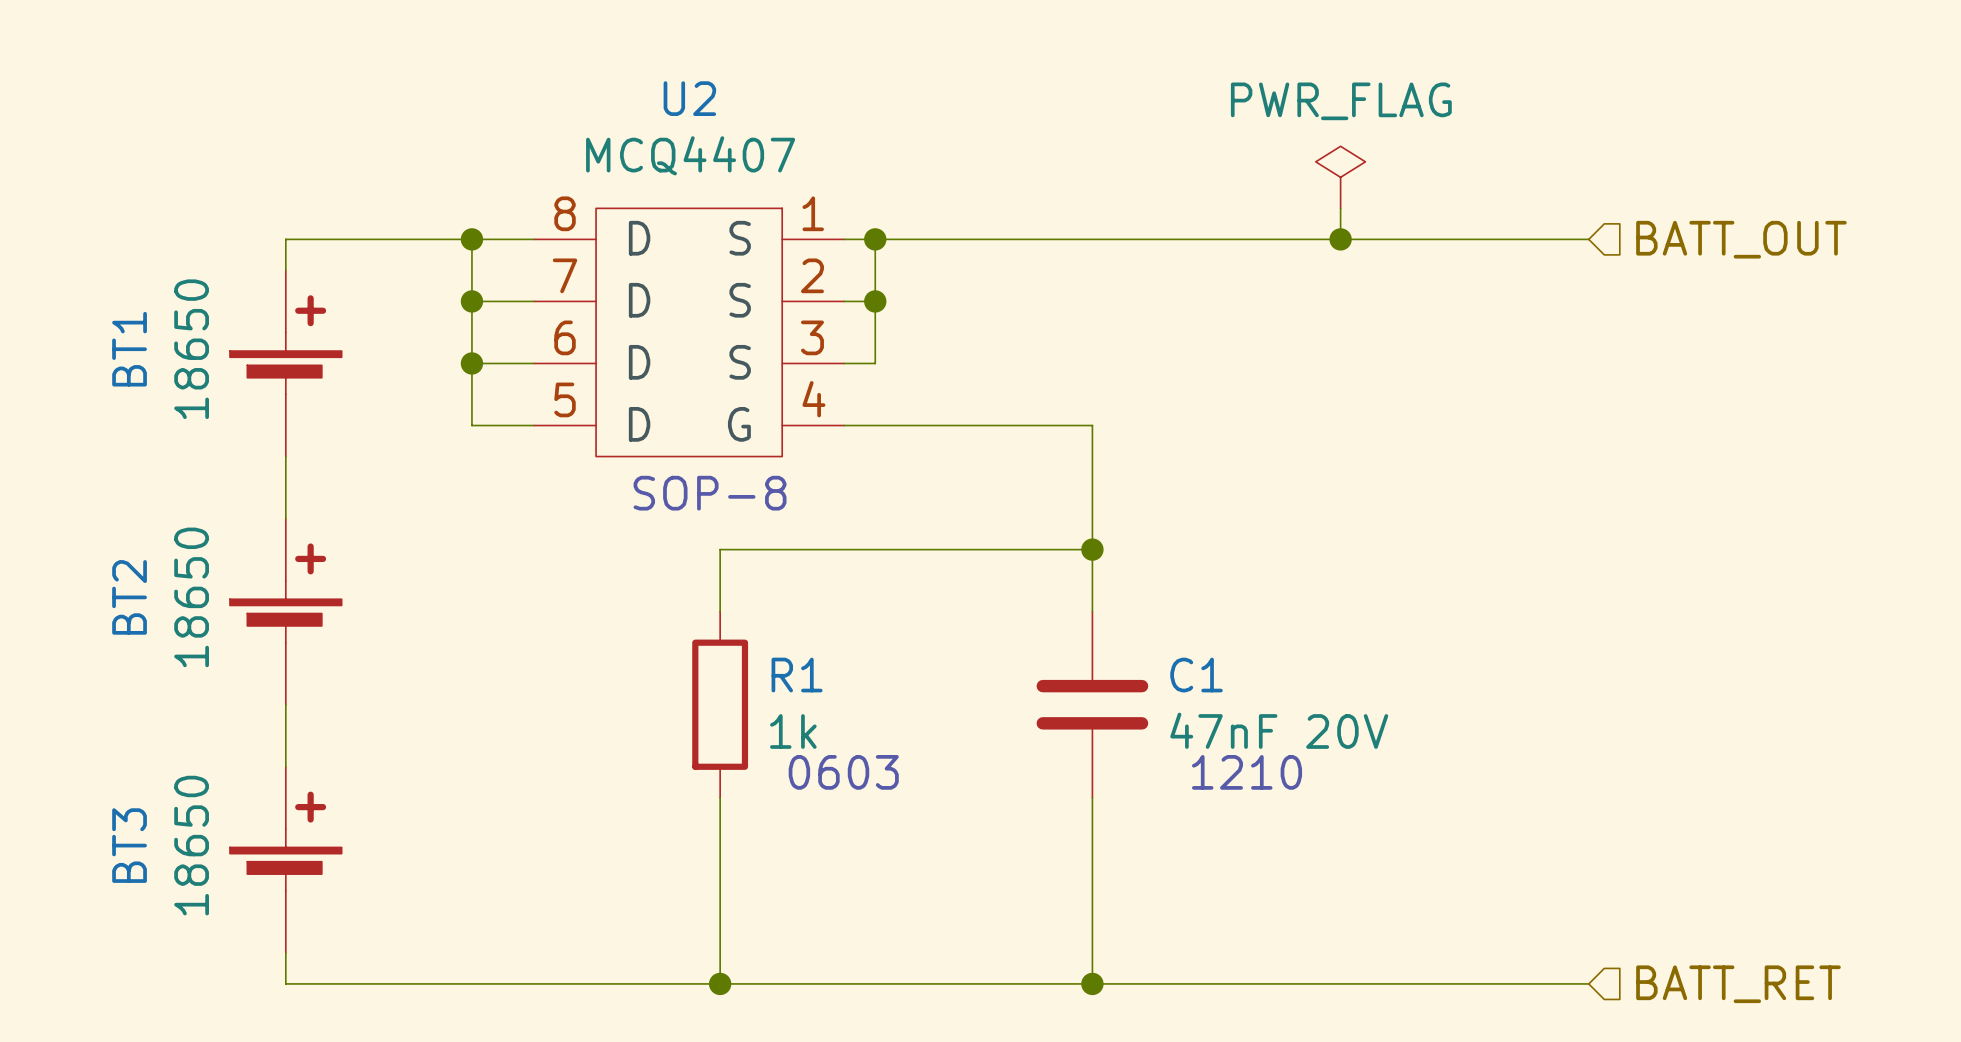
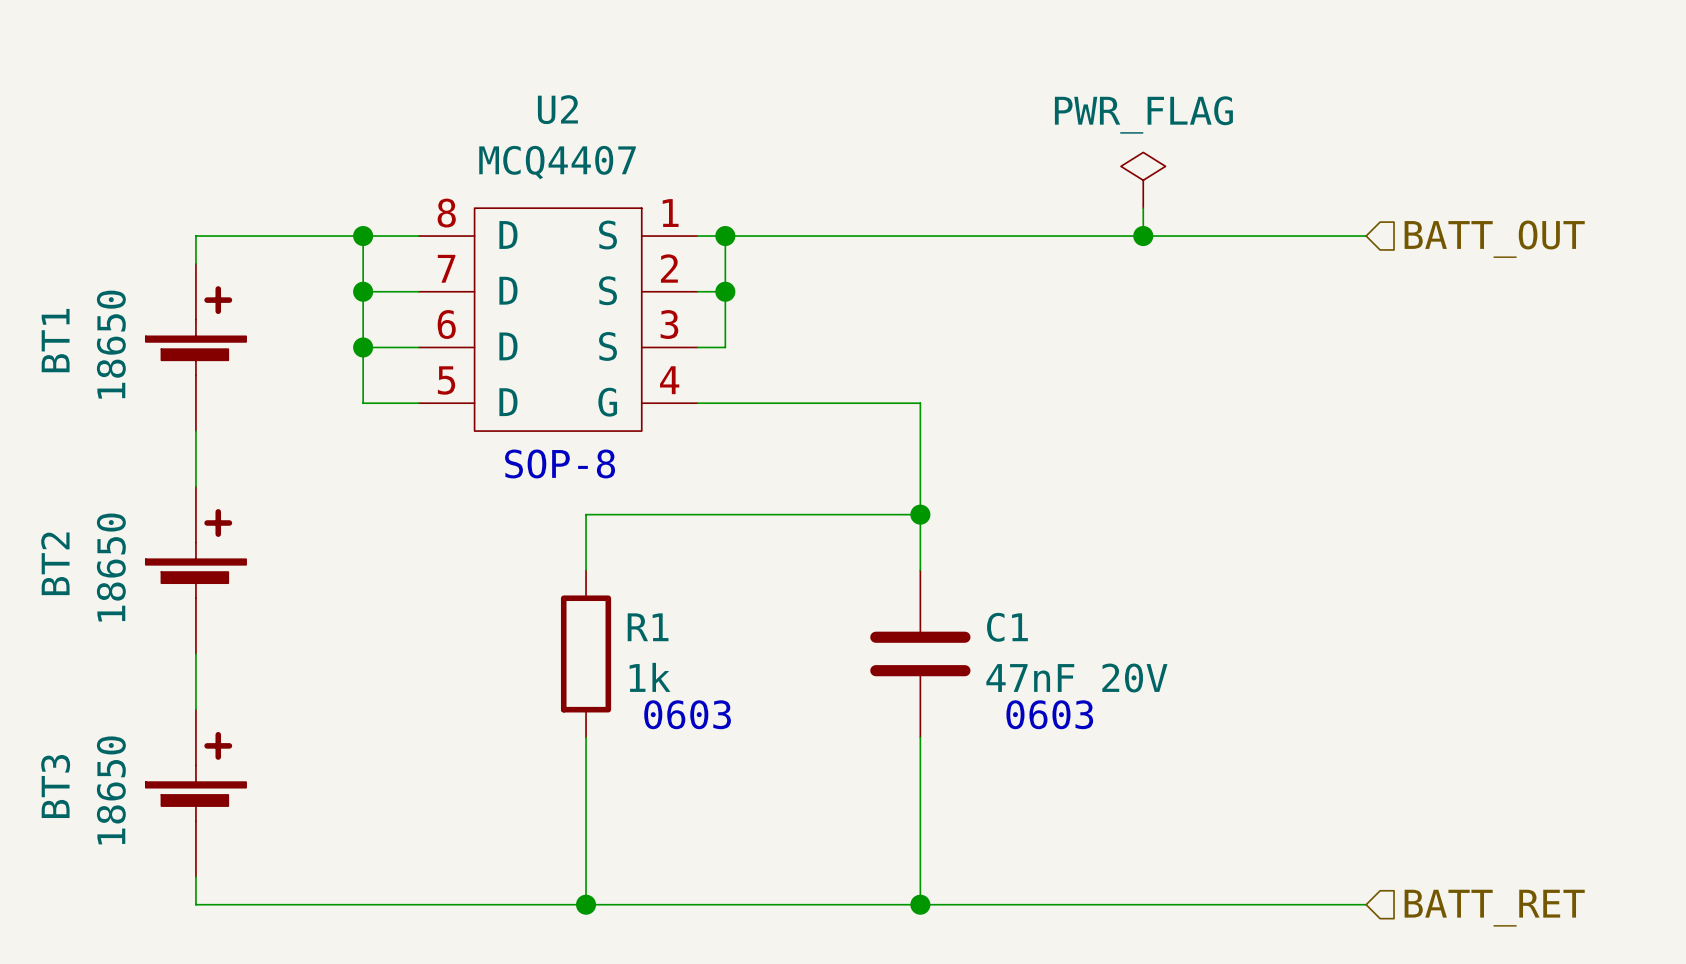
text: 1210 (1247, 772) -> 0603 (1049, 714)

